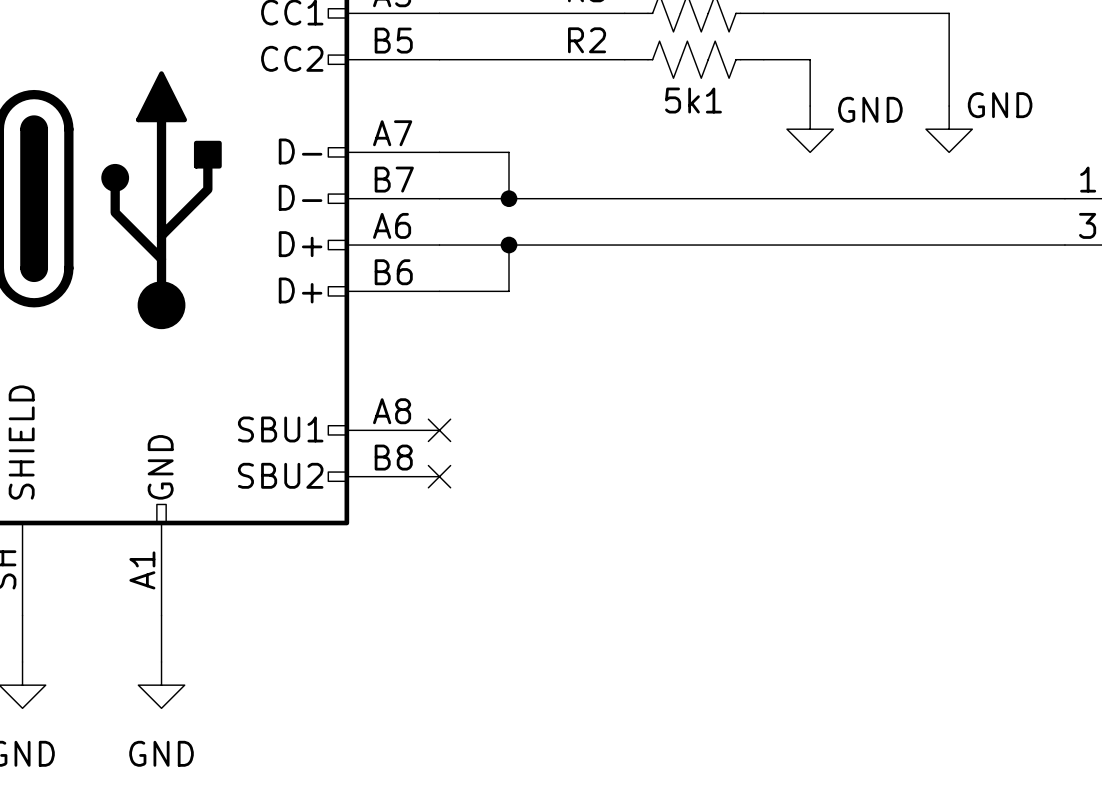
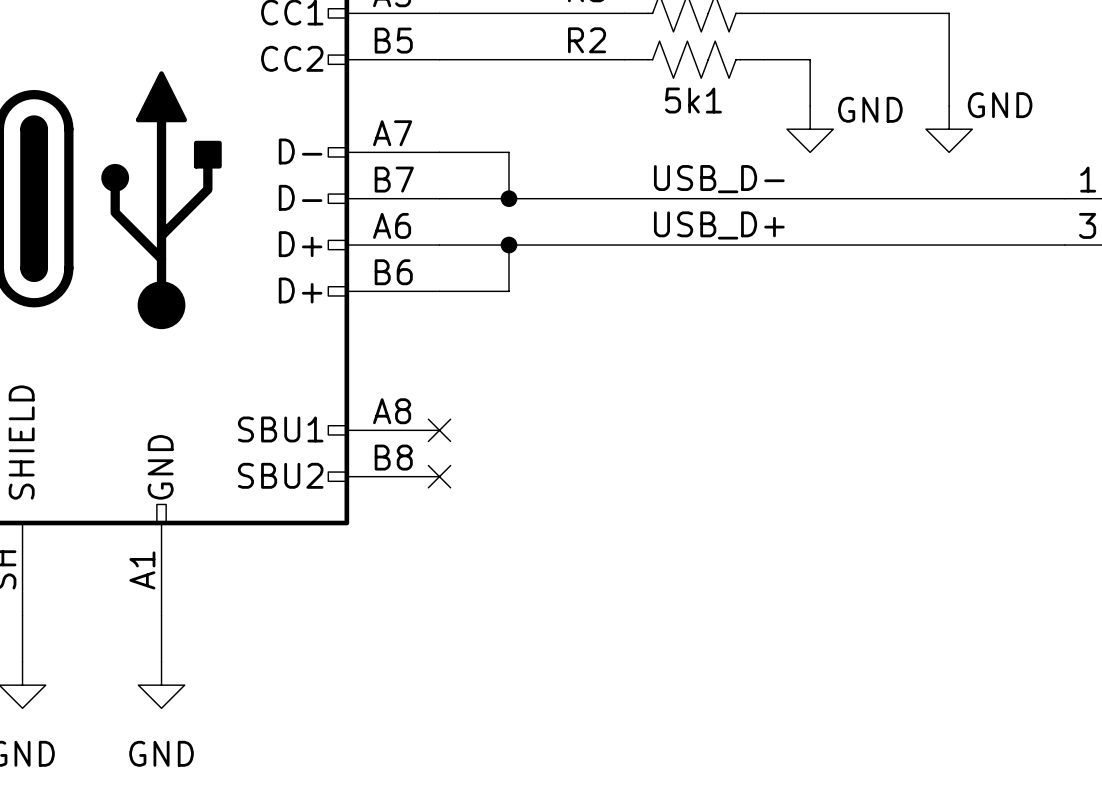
label: none -> USB_D- (719, 179)
label: none -> USB_D+ (719, 225)

